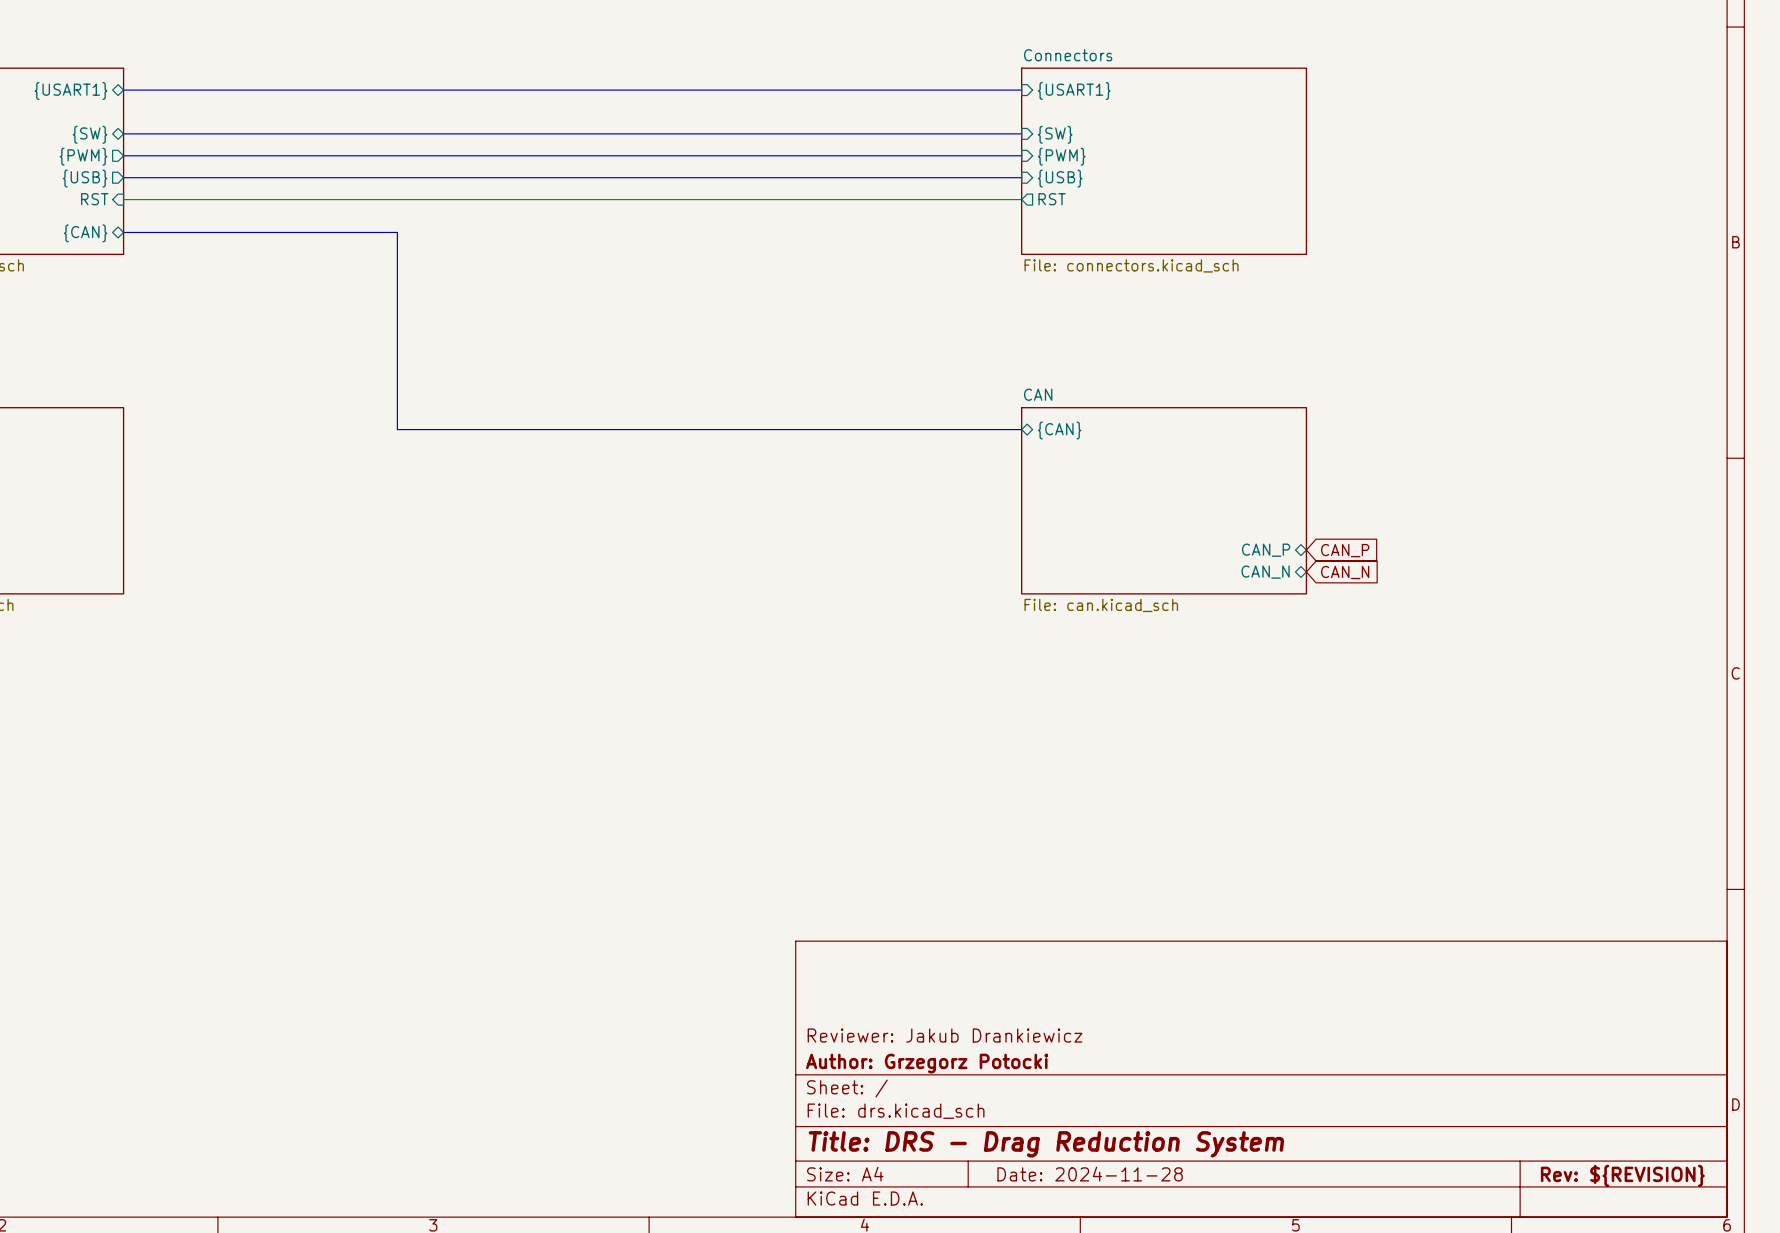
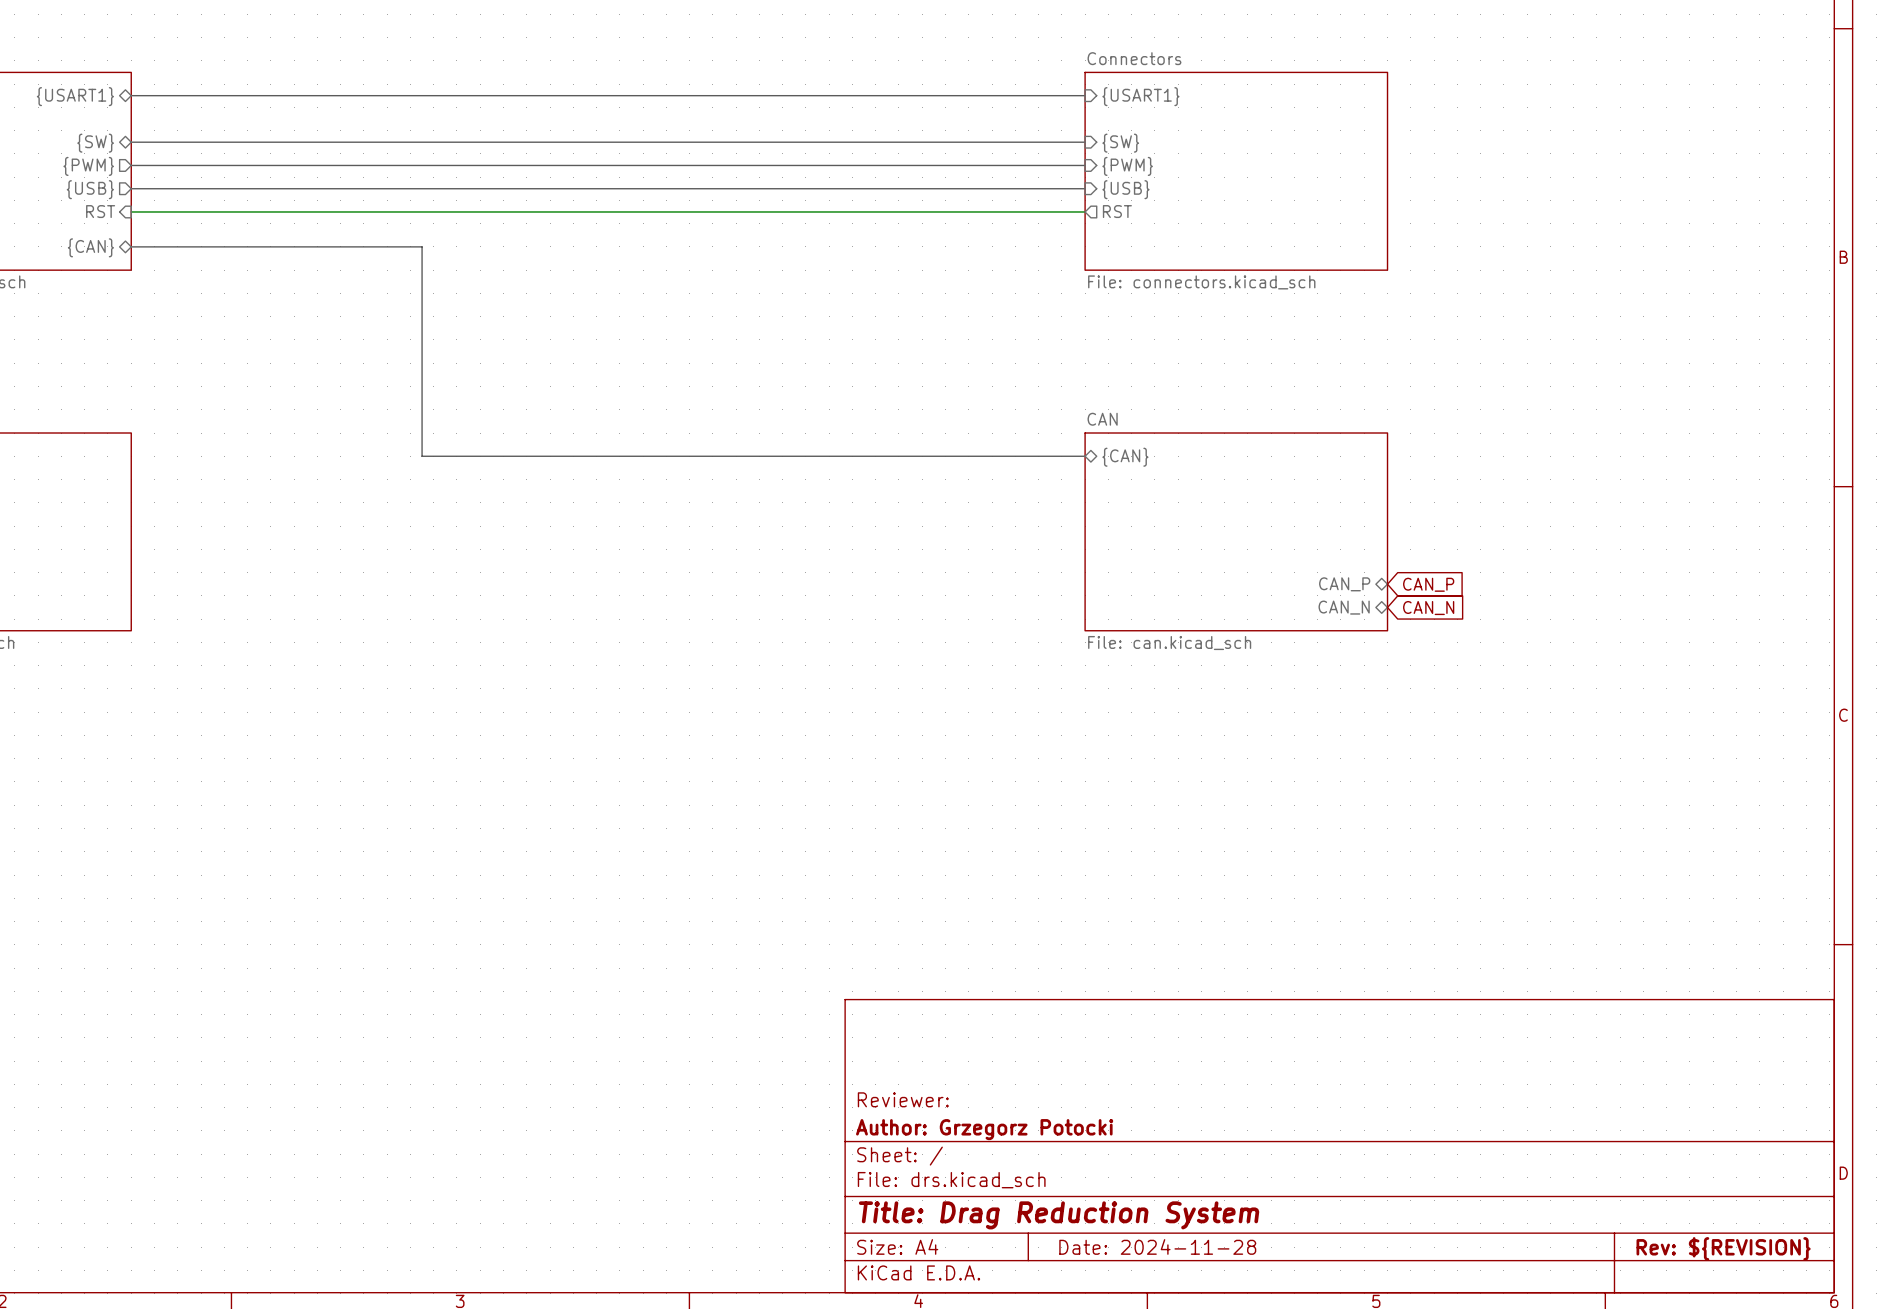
title block: Reviewer: Jakub Drankiewicz (945, 1035) -> Reviewer: (903, 1099)
title block: Title: DRS - Drag Reduction System (1046, 1144) -> Title: Drag Reduction System (1059, 1215)

